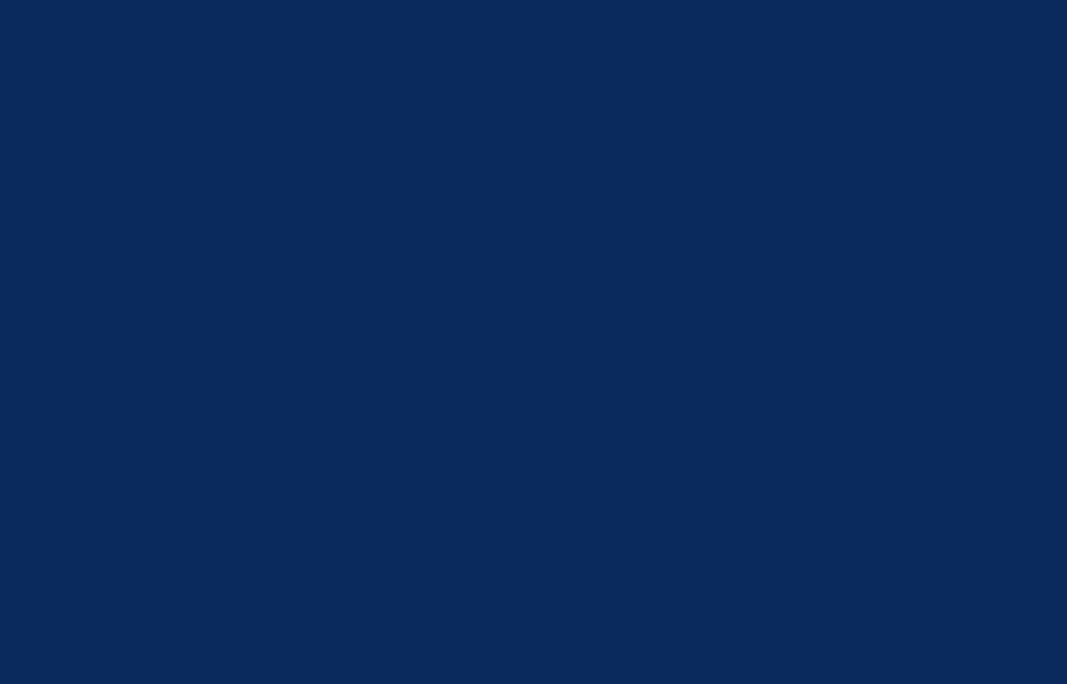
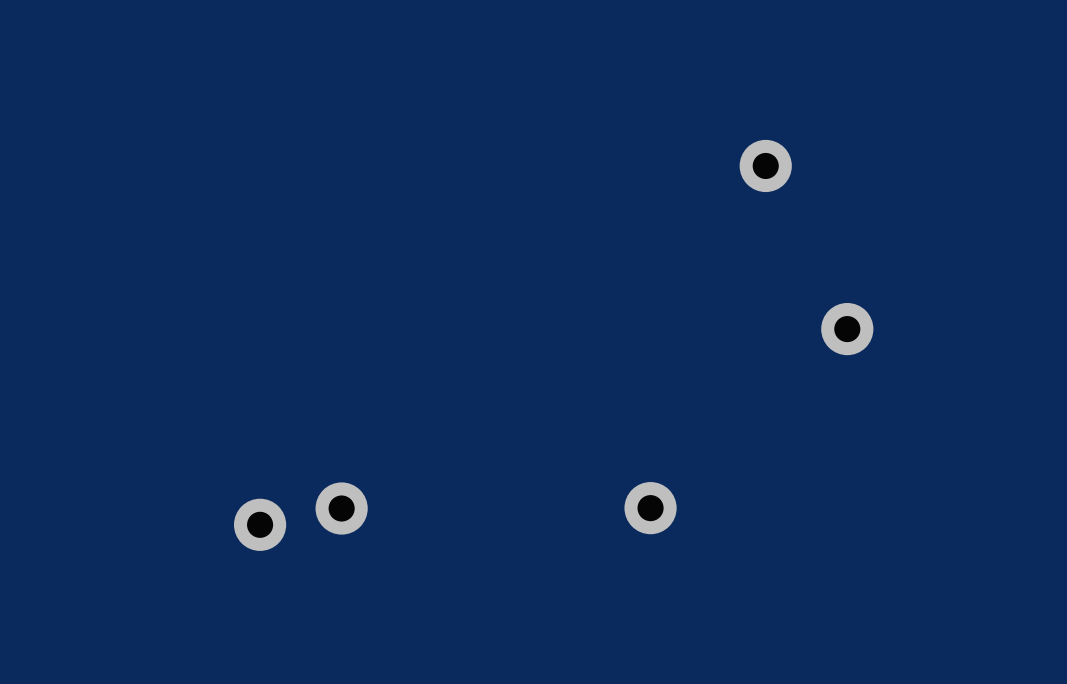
via: none -> (765, 165)
via: none -> (847, 329)
via: none -> (341, 508)
via: none -> (650, 508)
via: none -> (260, 524)

